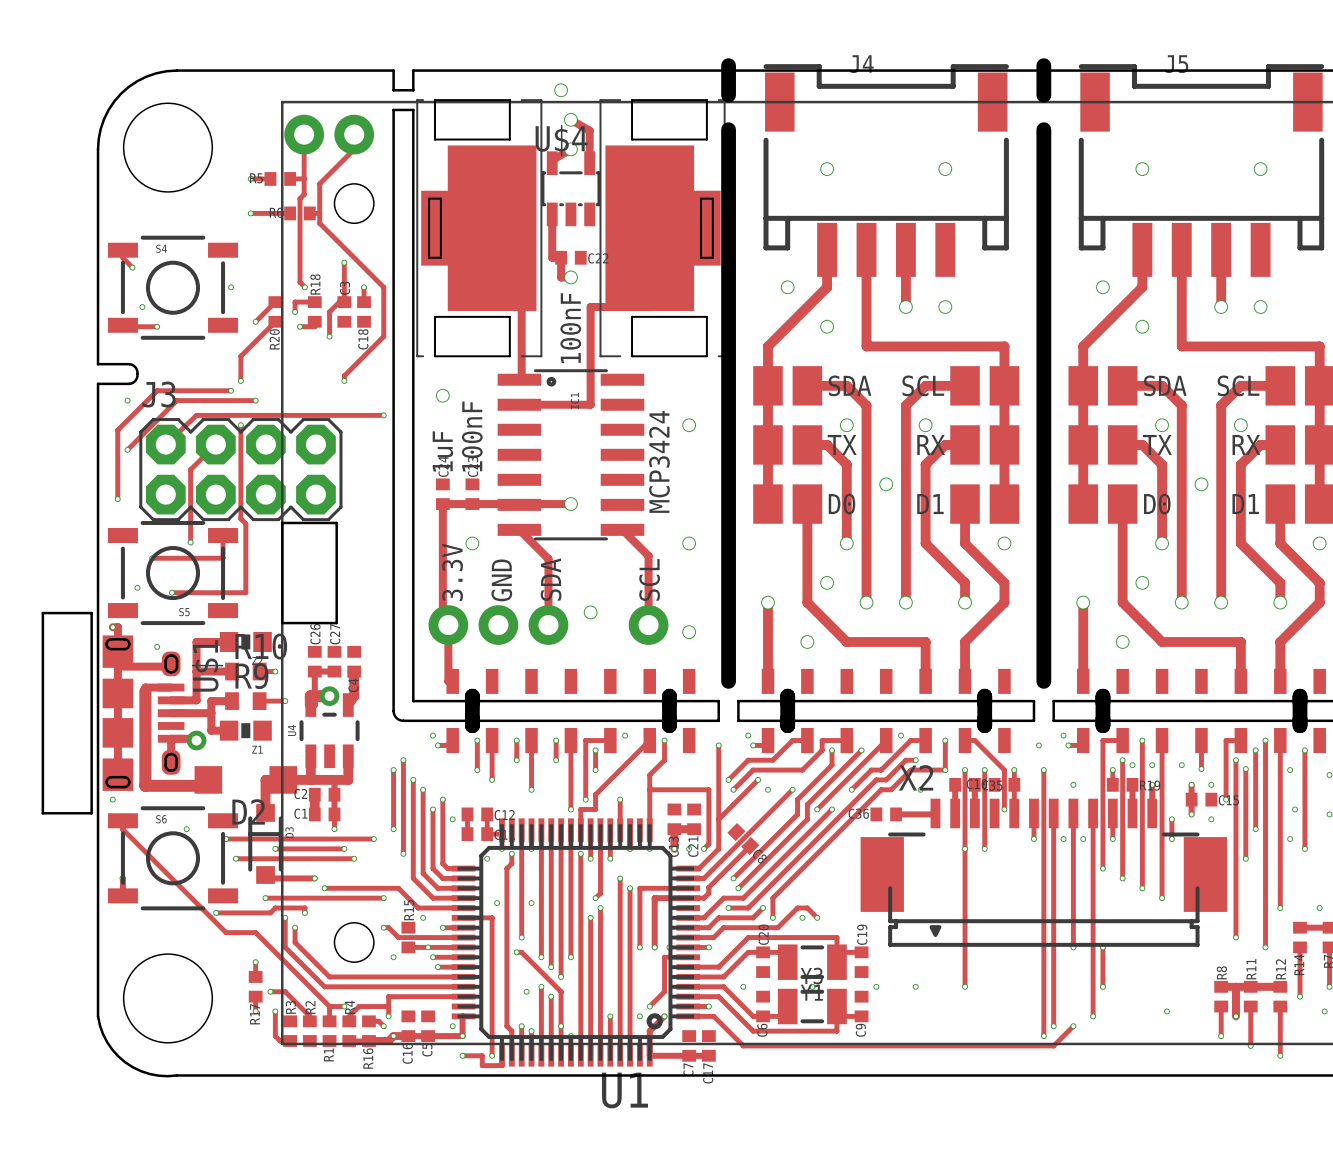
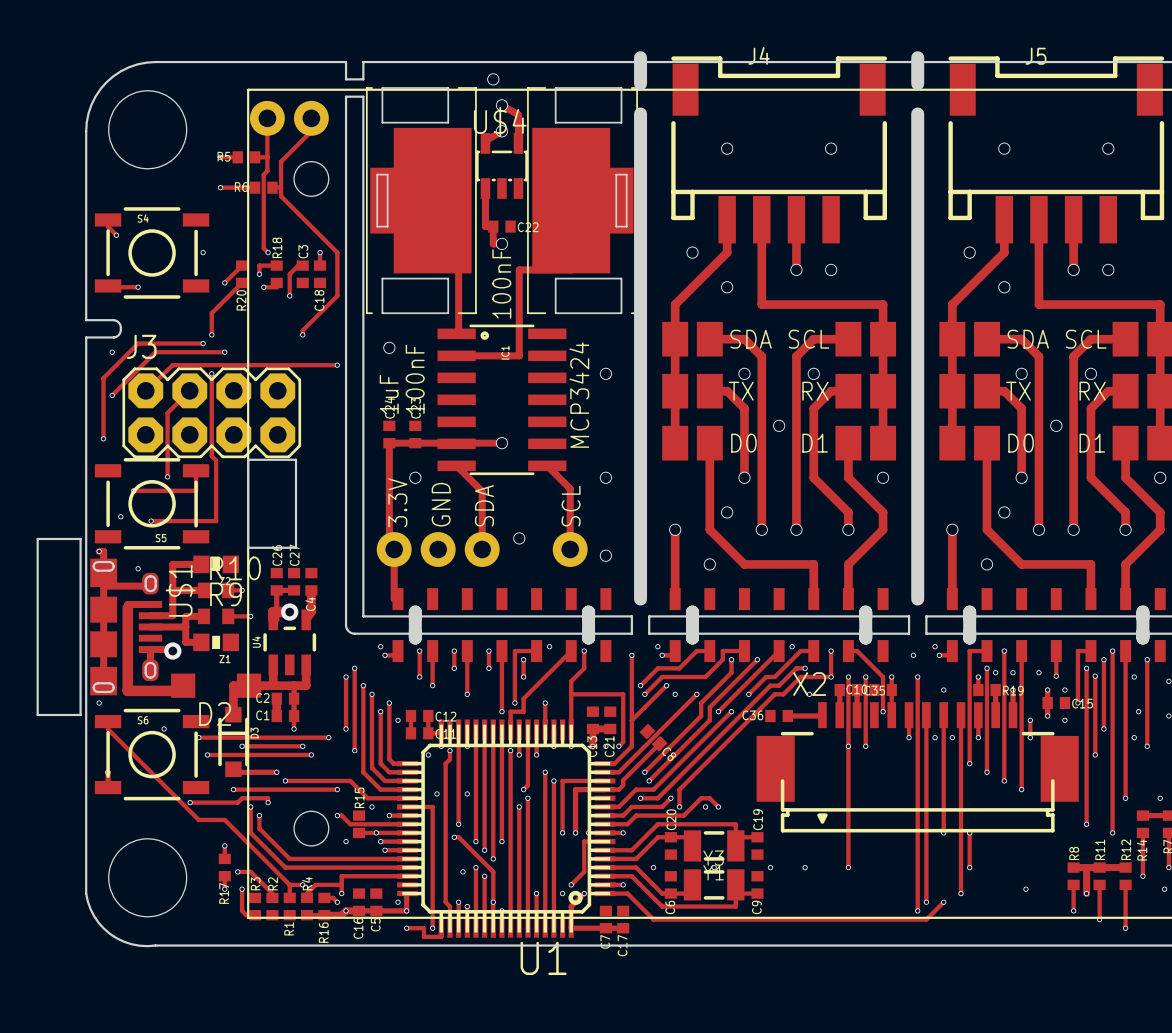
track: (344, 262) (344, 302) -> none
via: (344, 262) -> none
via: (142, 307) -> none

